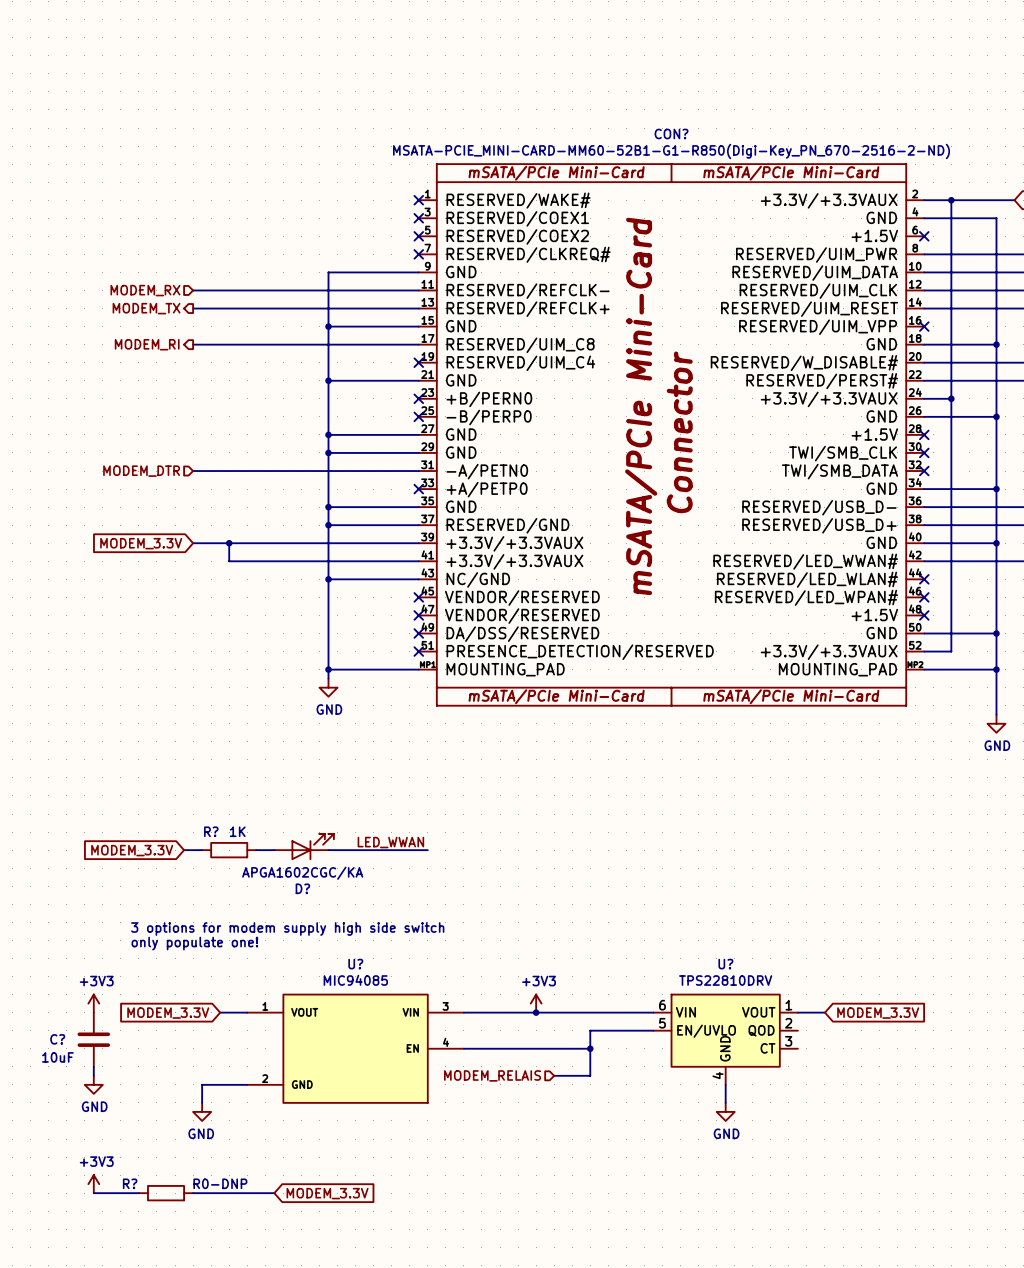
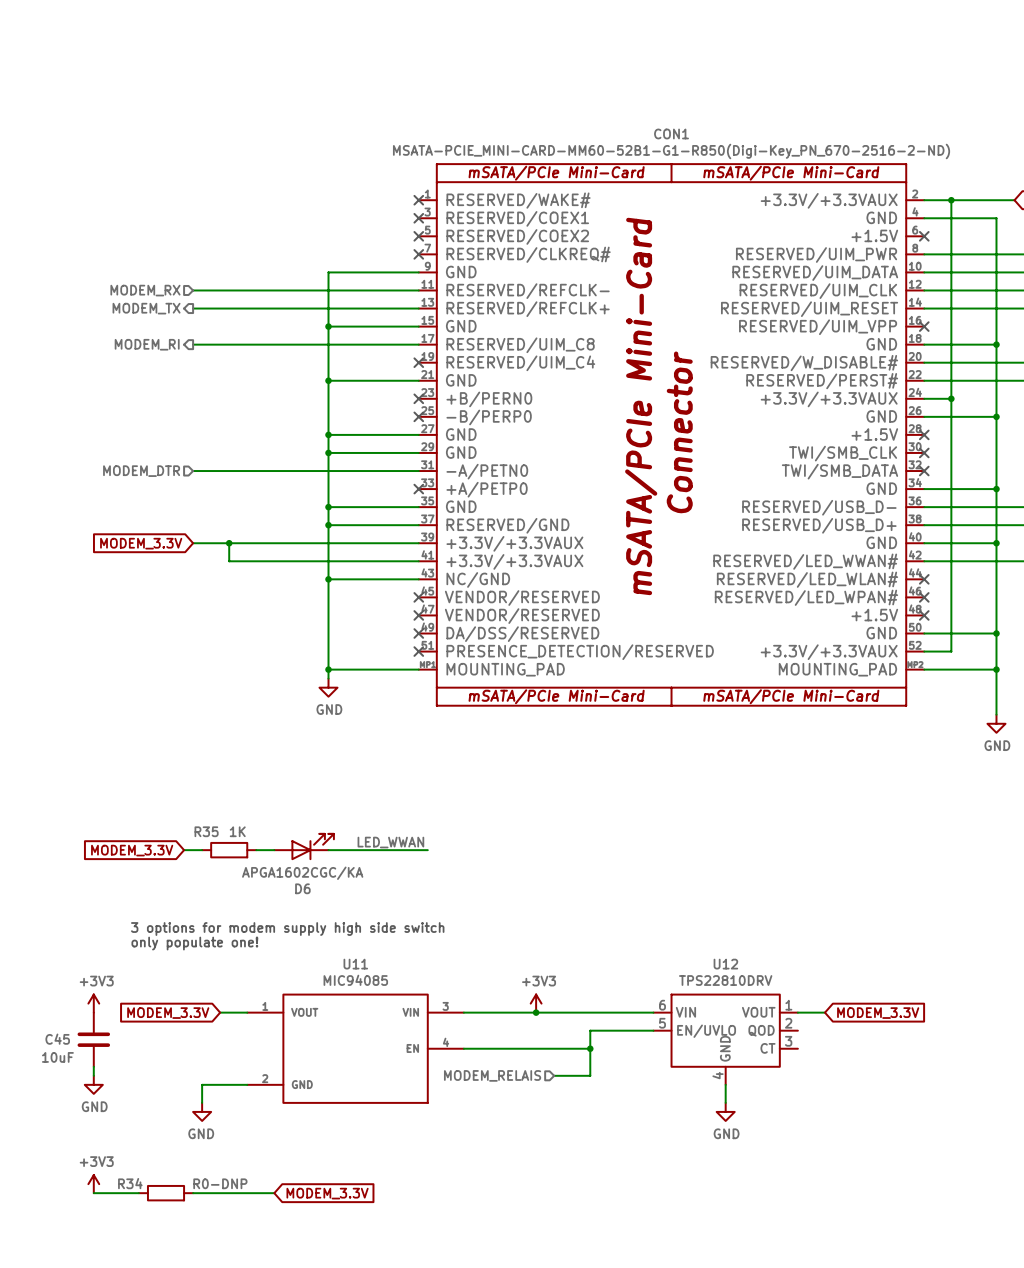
CON? name: CON? (671, 133) -> CON1 (671, 133)
R? name: R? (211, 831) -> R35 (206, 831)
D? name: D? (302, 888) -> D6 (302, 888)
U? name: U? (355, 964) -> U11 (355, 964)
U? name: U? (725, 964) -> U12 (725, 964)
C? name: C? (57, 1039) -> C45 (57, 1039)
R? name: R? (130, 1183) -> R34 (130, 1183)

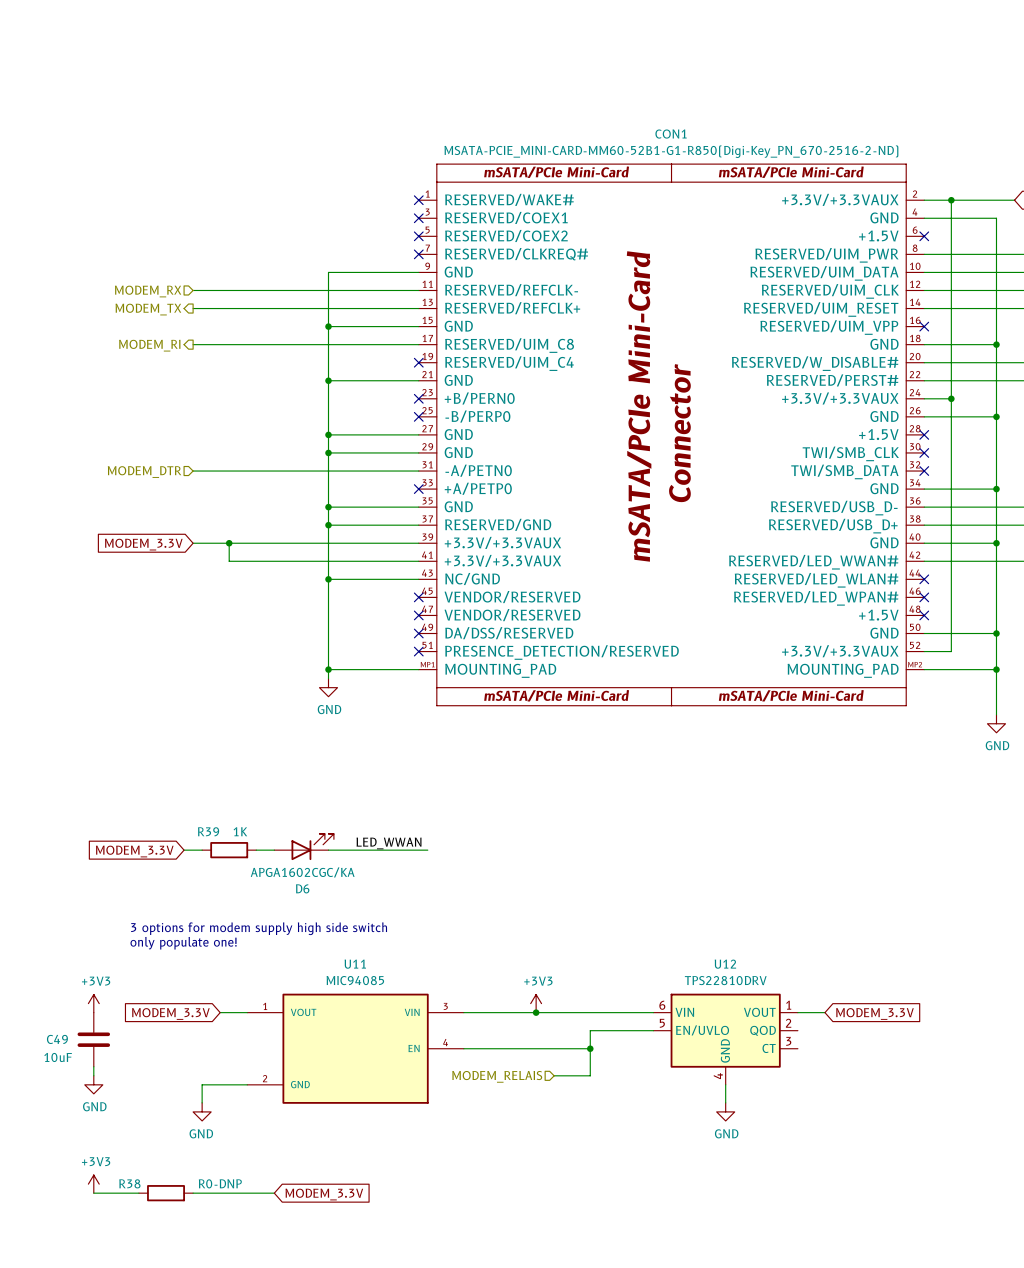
R35 name: R35 (206, 831) -> R39 (208, 831)
C45 name: C45 (57, 1039) -> C49 (57, 1039)
R34 name: R34 (130, 1183) -> R38 (129, 1183)

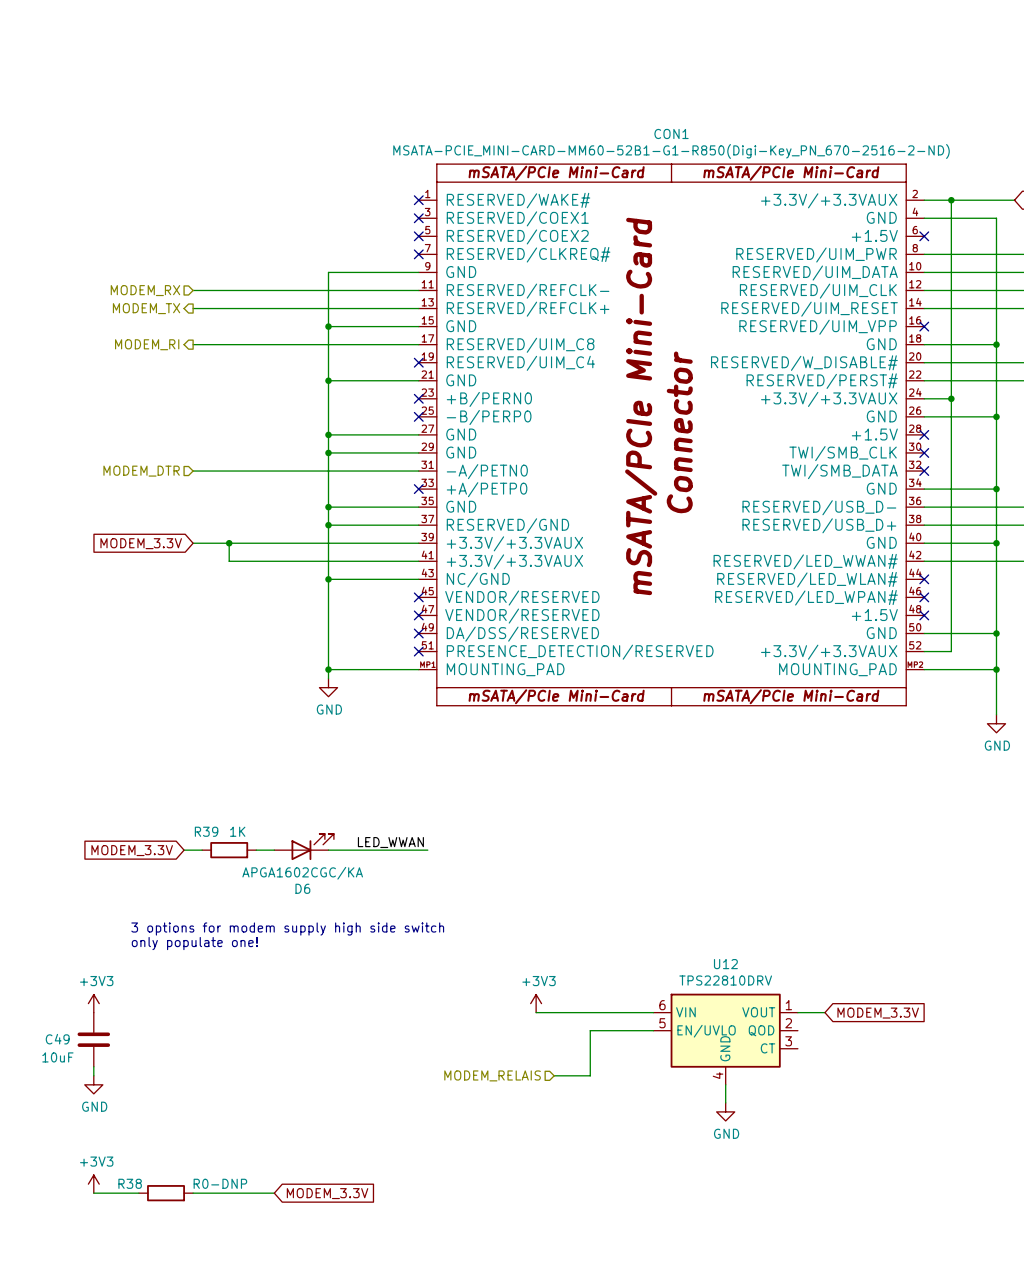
wire: (220, 1012) (247, 1012) -> none
wire: (463, 1012) (536, 1012) -> none
junction: (536, 1012) -> none
global label: MODEM_3.3V (170, 1013) -> none
U11: MIC94085 (355, 1048) -> none
wire: (463, 1048) (590, 1048) -> none
junction: (590, 1048) -> none
wire: (247, 1084) (202, 1084) (202, 1102) -> none
power symbol: GND (202, 1111) -> none

